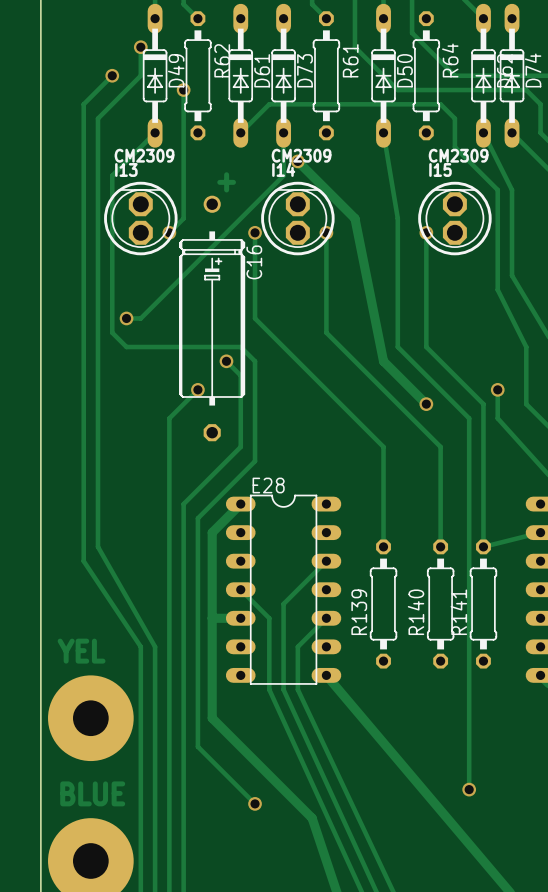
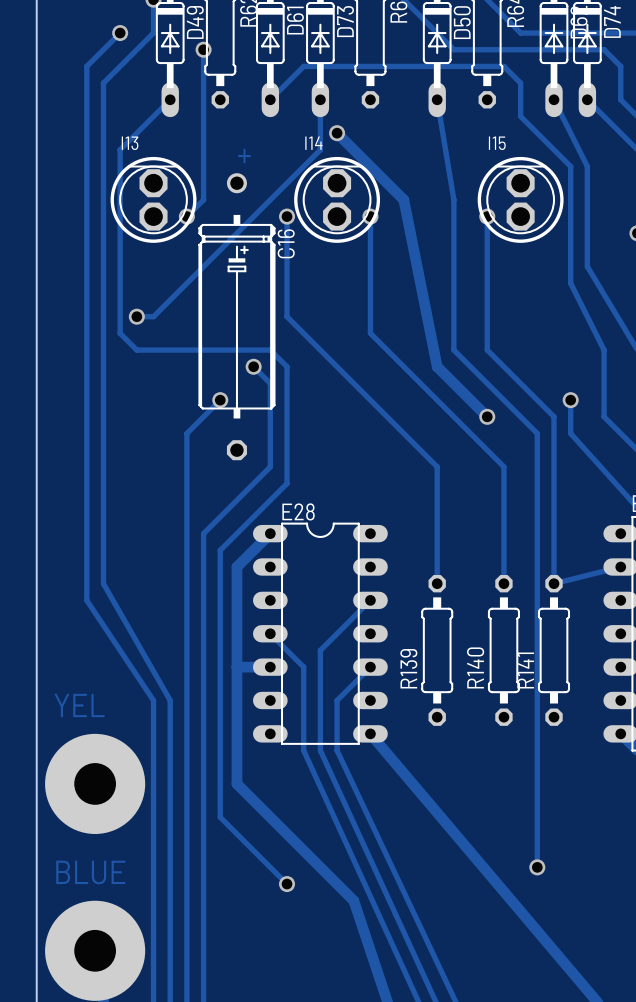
I13 value: CM2309 (144, 155) -> none
I14 value: CM2309 (301, 155) -> none
I15 value: CM2309 (458, 155) -> none

